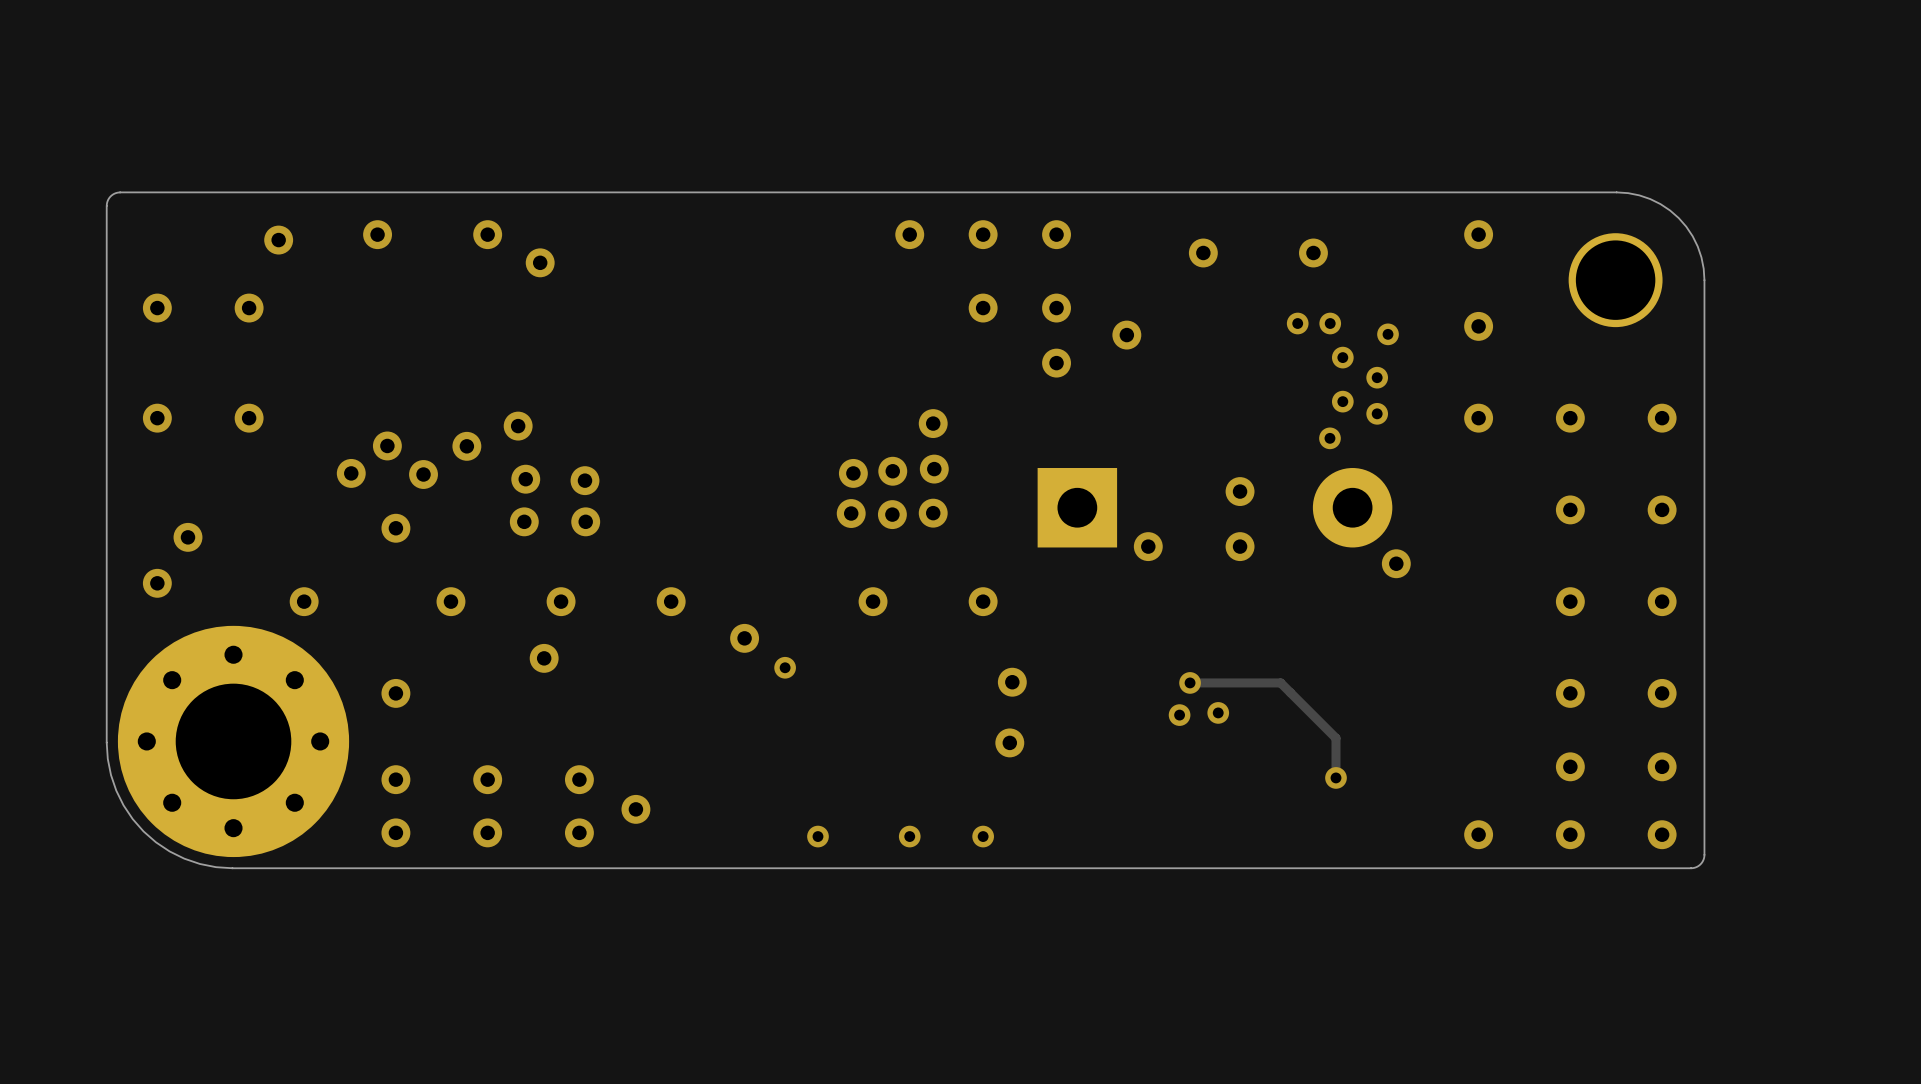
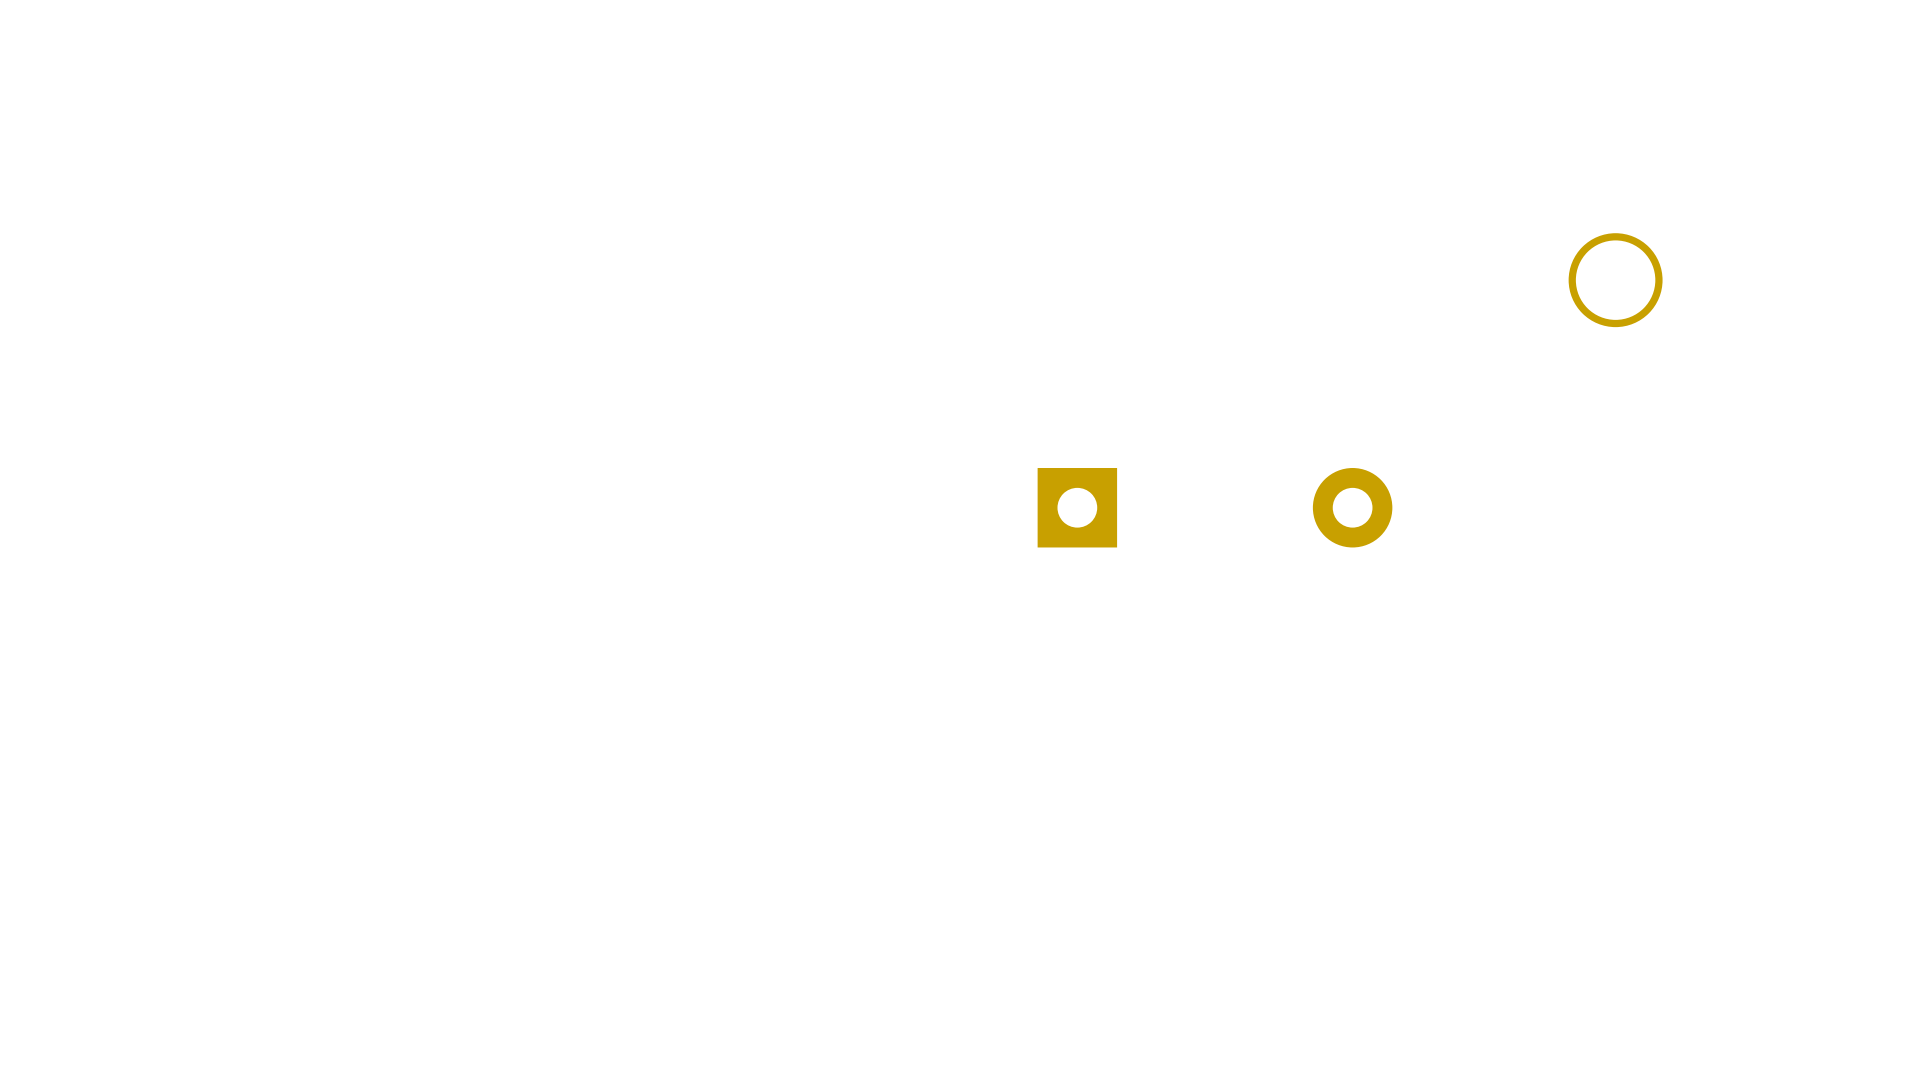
board edge: (106, 205) (110, 196) (120, 192) (1616, 192) (1650, 199) (1670, 210) (1686, 226) (1697, 246) (1703, 268) (1703, 859) (1699, 865) (1691, 868) (232, 868) (216, 867) (184, 858) (155, 842) (132, 819) (116, 790) (107, 758) (106, 206) -> none
via: (377, 234) -> none
via: (487, 234) -> none
via: (909, 234) -> none
via: (983, 234) -> none
via: (1056, 234) -> none
via: (1478, 234) -> none
via: (278, 240) -> none
via: (1203, 252) -> none
via: (1313, 252) -> none
via: (540, 262) -> none
via: (157, 308) -> none
via: (249, 308) -> none
via: (983, 308) -> none
via: (1056, 308) -> none
via: (1297, 323) -> none
via: (1330, 323) -> none
via: (1478, 326) -> none
via: (1388, 334) -> none
via: (1126, 335) -> none
via: (1342, 357) -> none
via: (1056, 363) -> none
via: (1377, 377) -> none
via: (1342, 401) -> none
via: (1377, 413) -> none
via: (157, 418) -> none
via: (249, 418) -> none
via: (1478, 418) -> none
via: (1570, 418) -> none
via: (1662, 418) -> none
via: (933, 423) -> none
via: (518, 426) -> none
via: (1329, 438) -> none
via: (387, 445) -> none
via: (466, 446) -> none
via: (934, 469) -> none
via: (892, 471) -> none
via: (351, 473) -> none
via: (853, 473) -> none
via: (423, 474) -> none
via: (525, 479) -> none
via: (584, 480) -> none
via: (1240, 491) -> none
via: (1570, 509) -> none
via: (1662, 509) -> none
via: (851, 513) -> none
via: (933, 513) -> none
via: (892, 514) -> none
via: (524, 521) -> none
via: (585, 521) -> none
via: (395, 528) -> none
via: (187, 537) -> none
via: (1148, 546) -> none
via: (1240, 546) -> none
via: (1396, 563) -> none
via: (157, 583) -> none
via: (304, 601) -> none
via: (450, 601) -> none
via: (561, 601) -> none
via: (671, 601) -> none
via: (873, 601) -> none
via: (983, 601) -> none
via: (1570, 601) -> none
via: (1662, 601) -> none
via: (744, 638) -> none
via: (544, 658) -> none
via: (785, 667) -> none
via: (1012, 682) -> none
track: (1190, 682) (1280, 682) (1336, 738) (1336, 777) -> none
via: (1190, 682) -> none
via: (395, 693) -> none
via: (1570, 693) -> none
via: (1662, 693) -> none
via: (1218, 712) -> none
via: (1179, 715) -> none
part: (233, 741) -> none
via: (1009, 742) -> none
via: (1570, 766) -> none
via: (1662, 766) -> none
via: (1336, 777) -> none
via: (395, 779) -> none
via: (487, 779) -> none
via: (579, 779) -> none
via: (635, 809) -> none
via: (395, 832) -> none
via: (487, 832) -> none
via: (579, 832) -> none
via: (1478, 834) -> none
via: (1570, 834) -> none
via: (1662, 834) -> none
via: (817, 836) -> none
via: (909, 836) -> none
via: (983, 836) -> none

